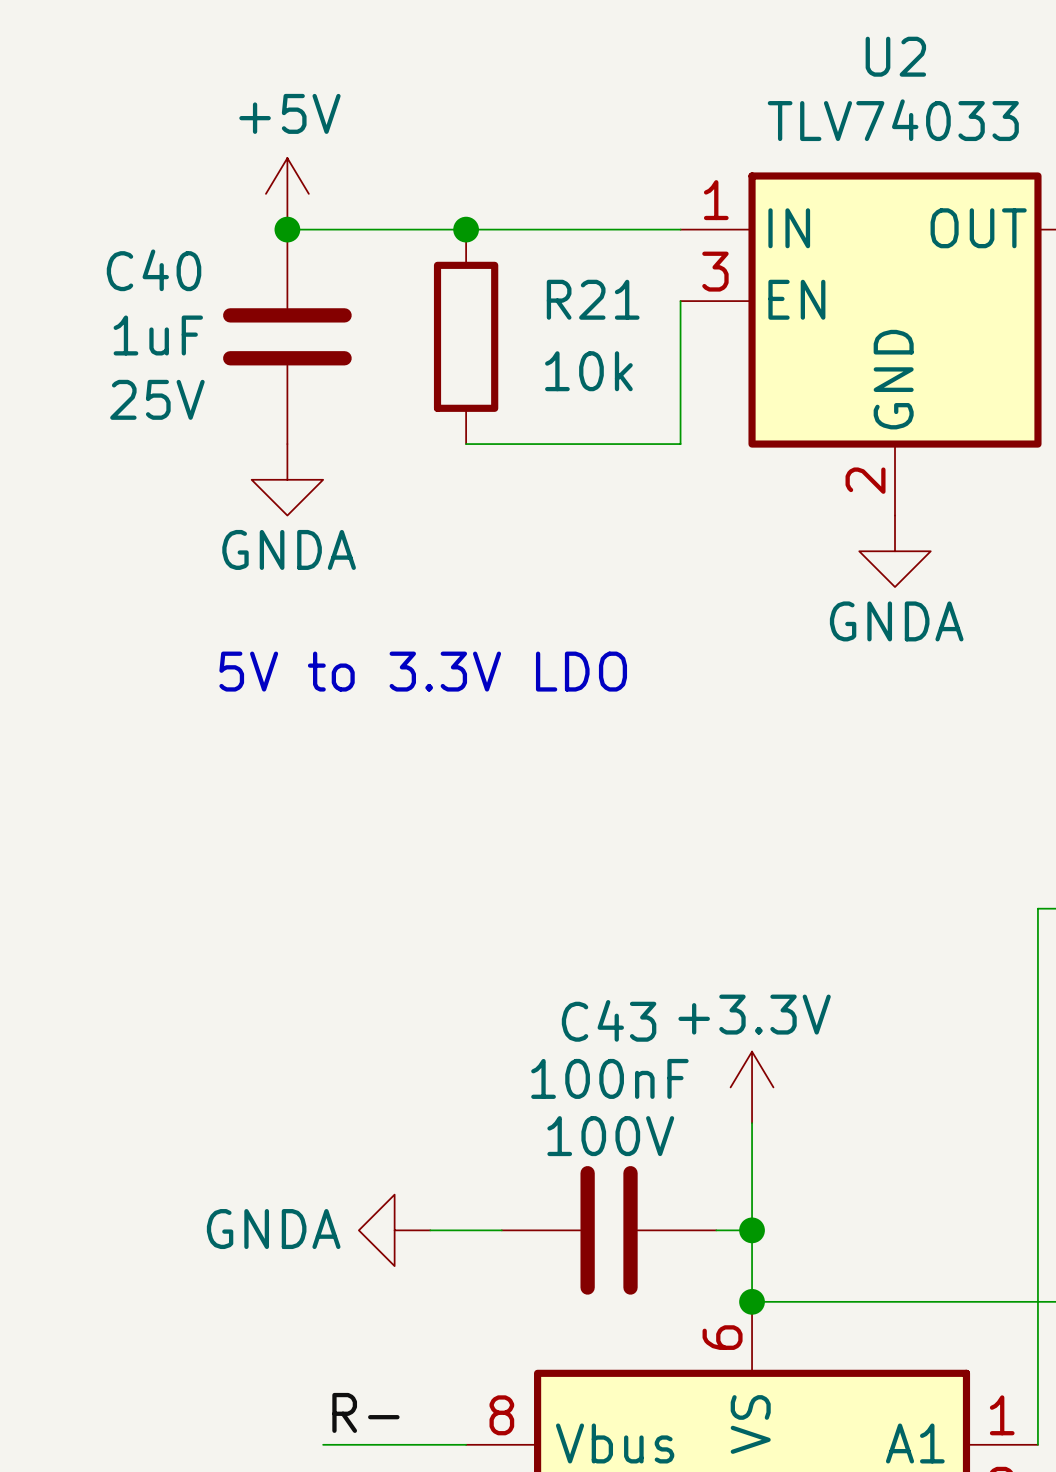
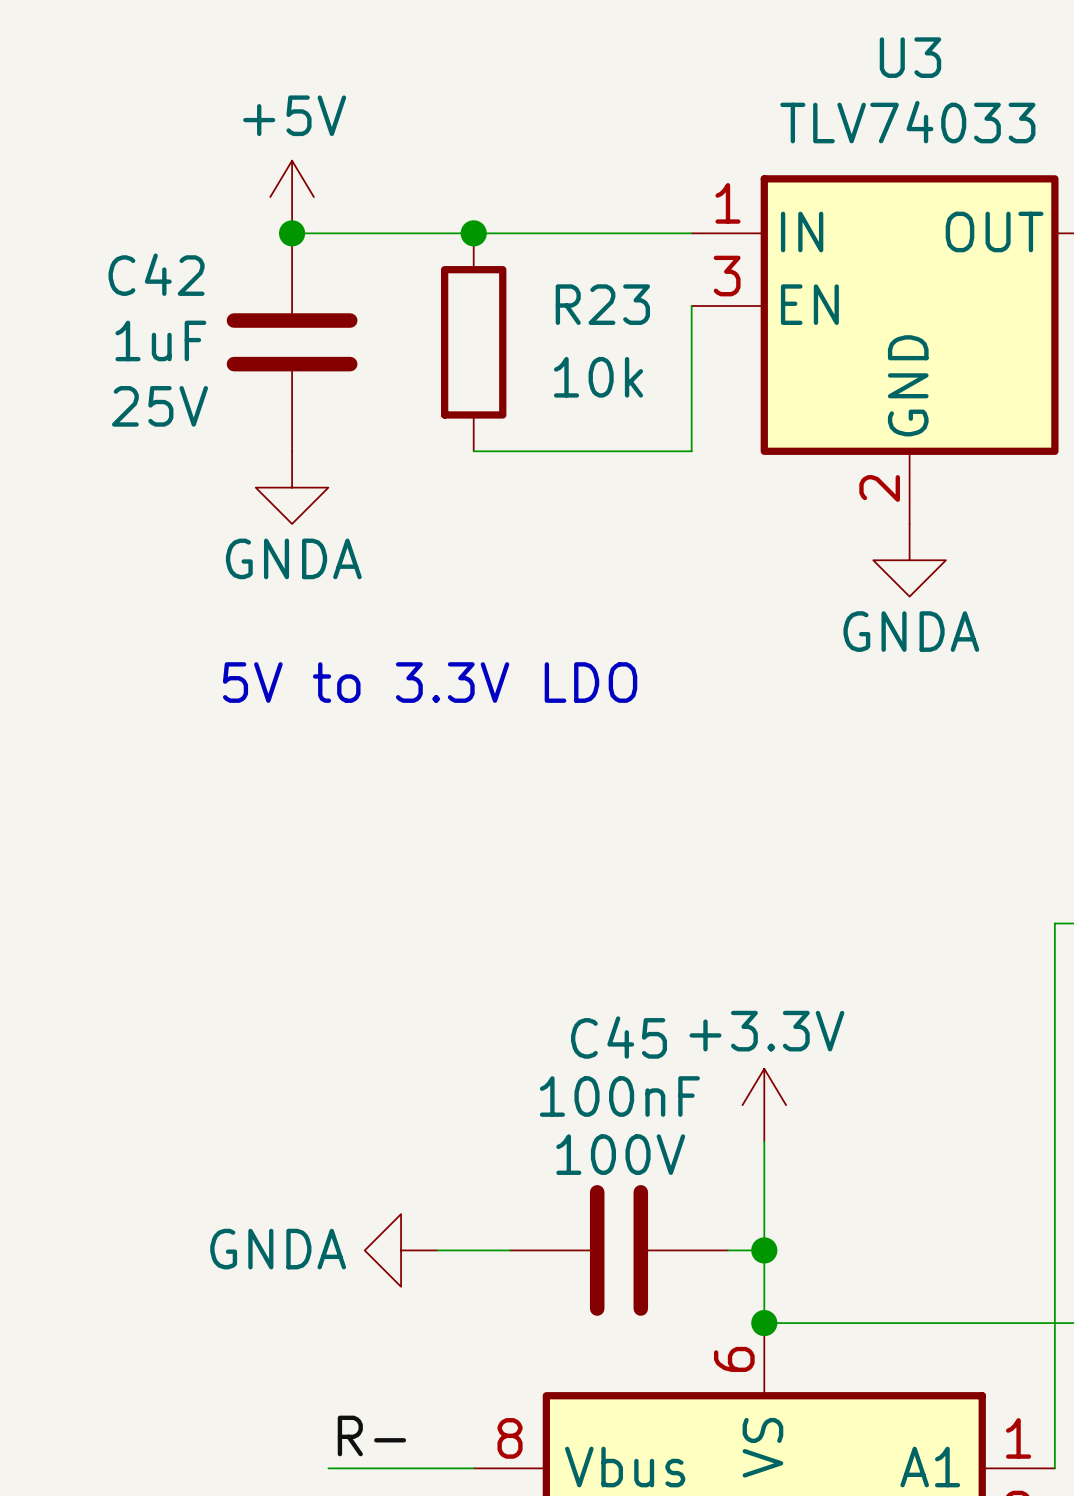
U2 name: U2 (895, 56) -> U3 (910, 57)
C40 name: C40 (154, 270) -> C42 (156, 274)
R21 name: R21 (593, 299) -> R23 (602, 304)
C43 name: C43 (609, 1020) -> C45 (619, 1037)

